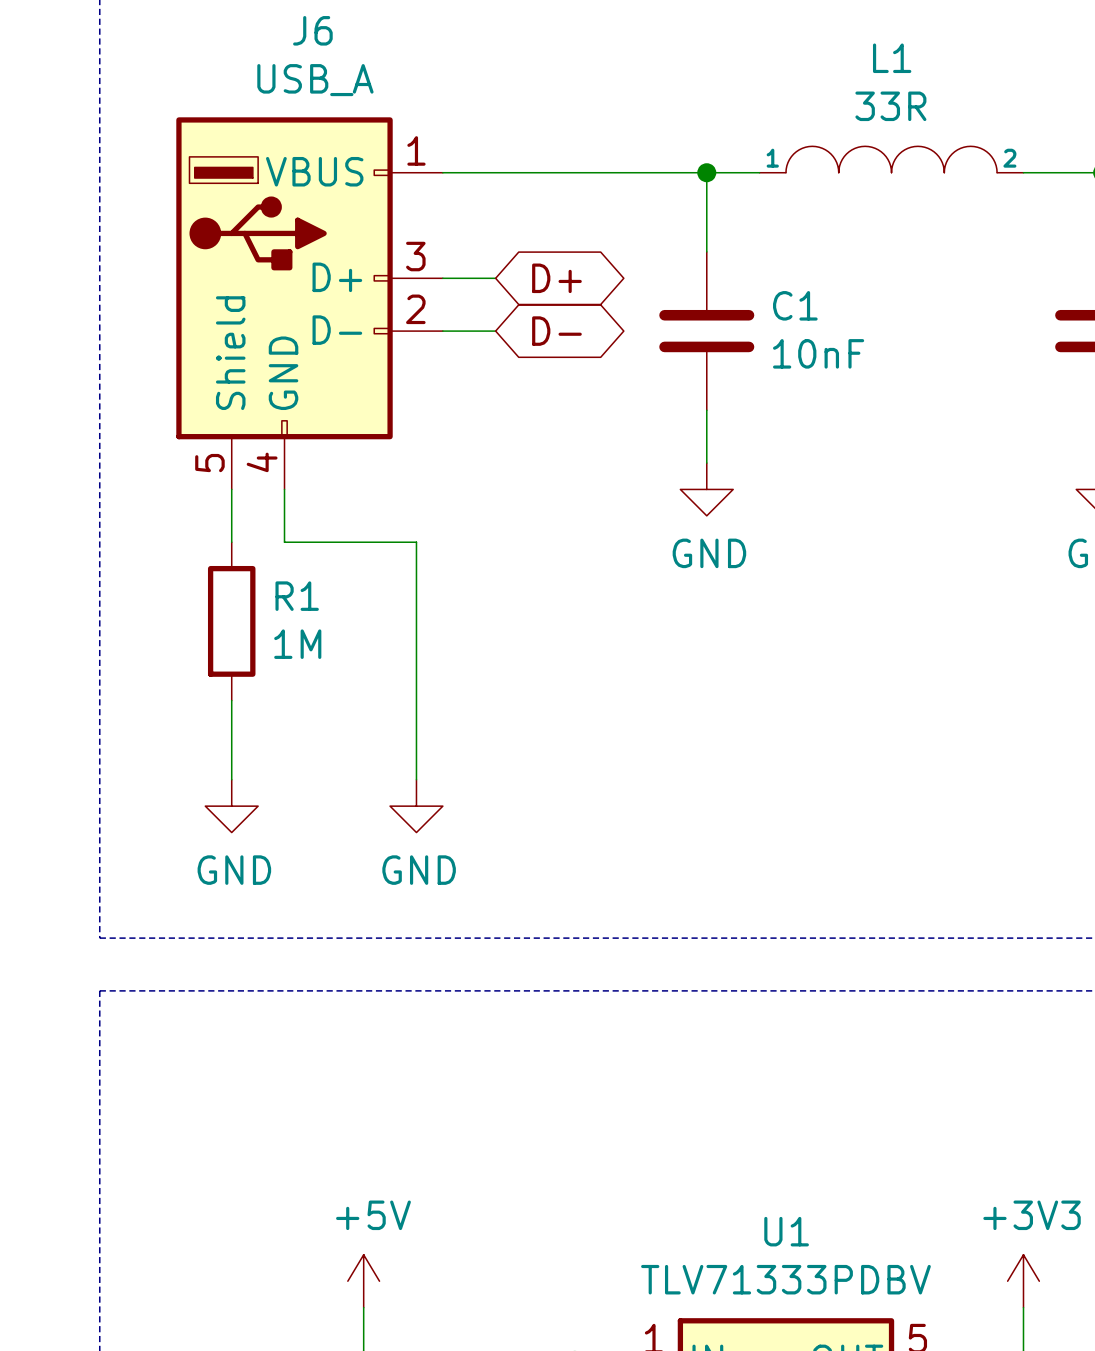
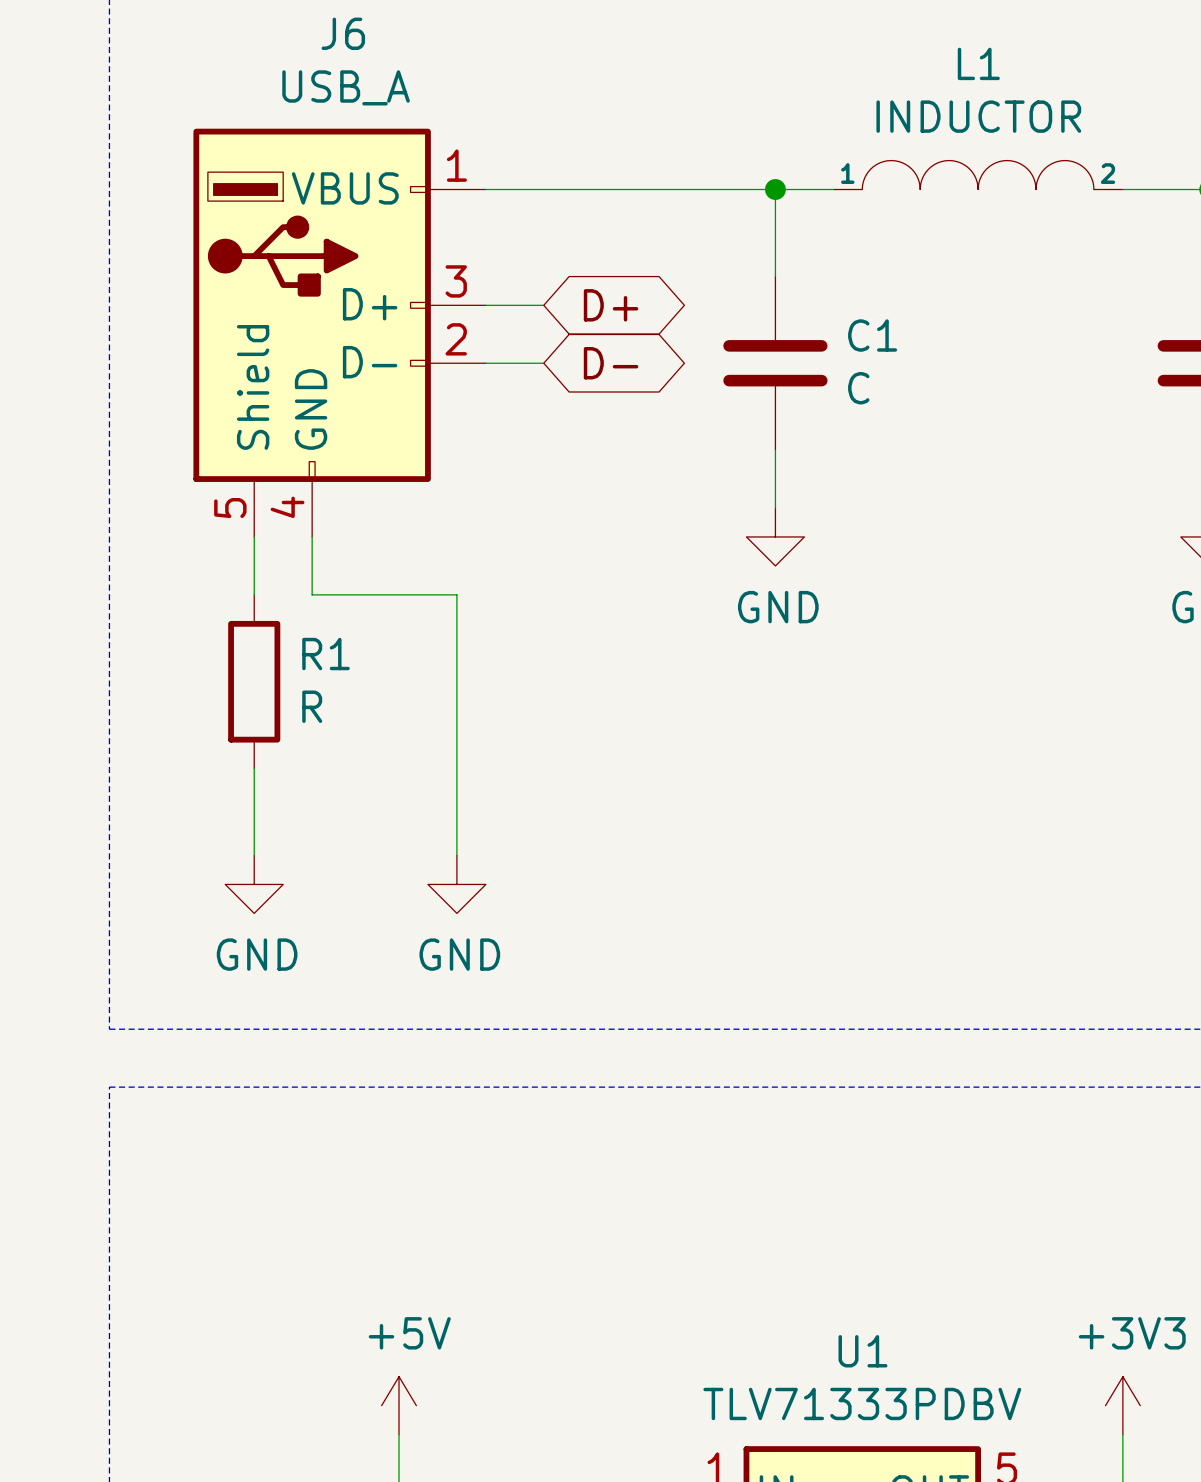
L1 value: 33R (890, 106) -> INDUCTOR (978, 116)
C1 value: 10nF (818, 353) -> C (858, 388)
R1 value: 1M (297, 644) -> R (312, 706)

